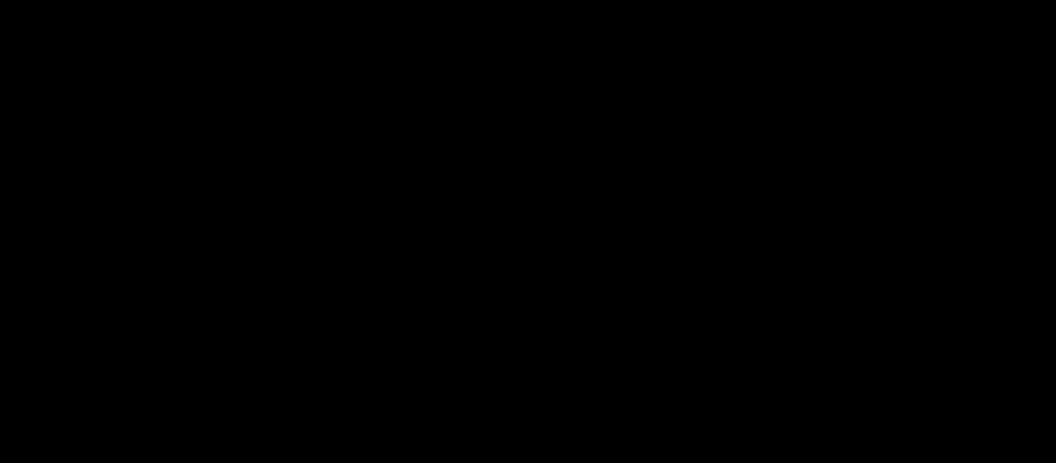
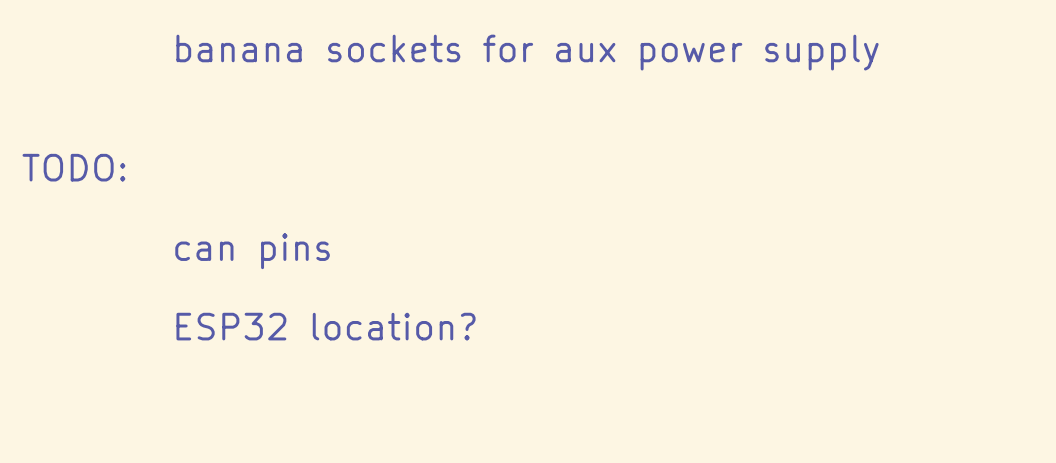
text: none -> banana sockets for aux power supply (527, 52)
text: none -> TODO: (73, 167)
text: none -> can pins (252, 251)
text: none -> ESP32 location? (326, 326)

